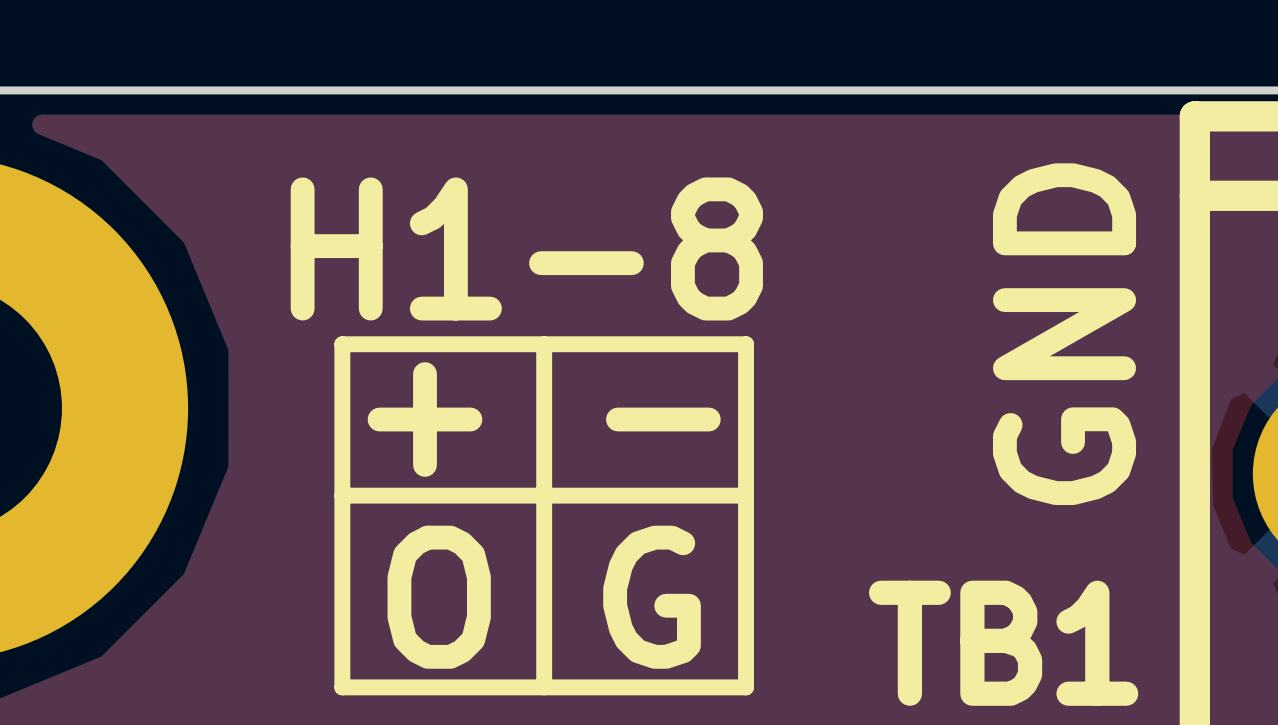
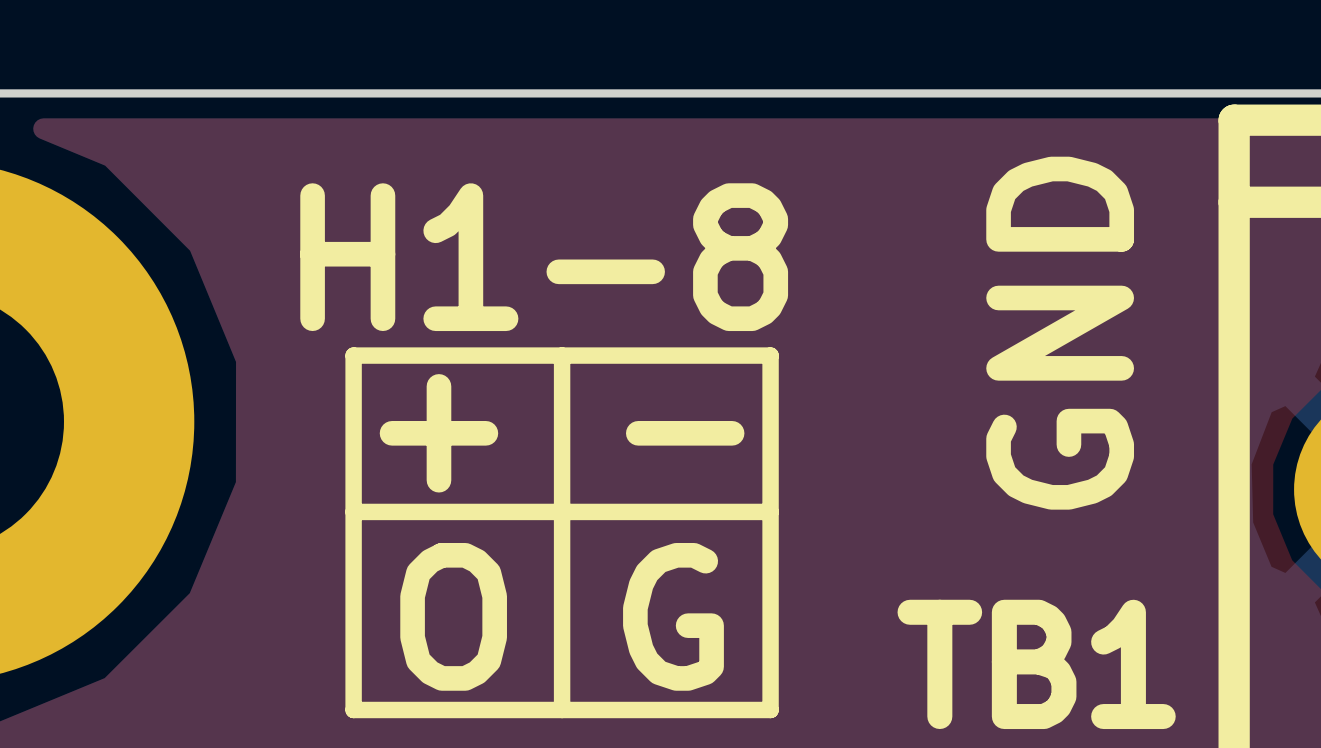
text position: GND (1064, 334) -> GND (1060, 333)

